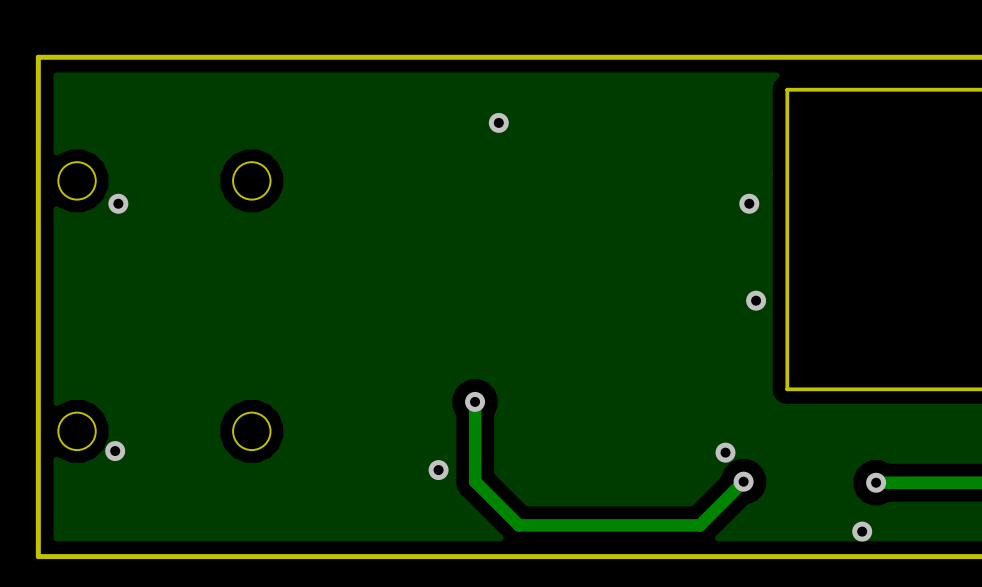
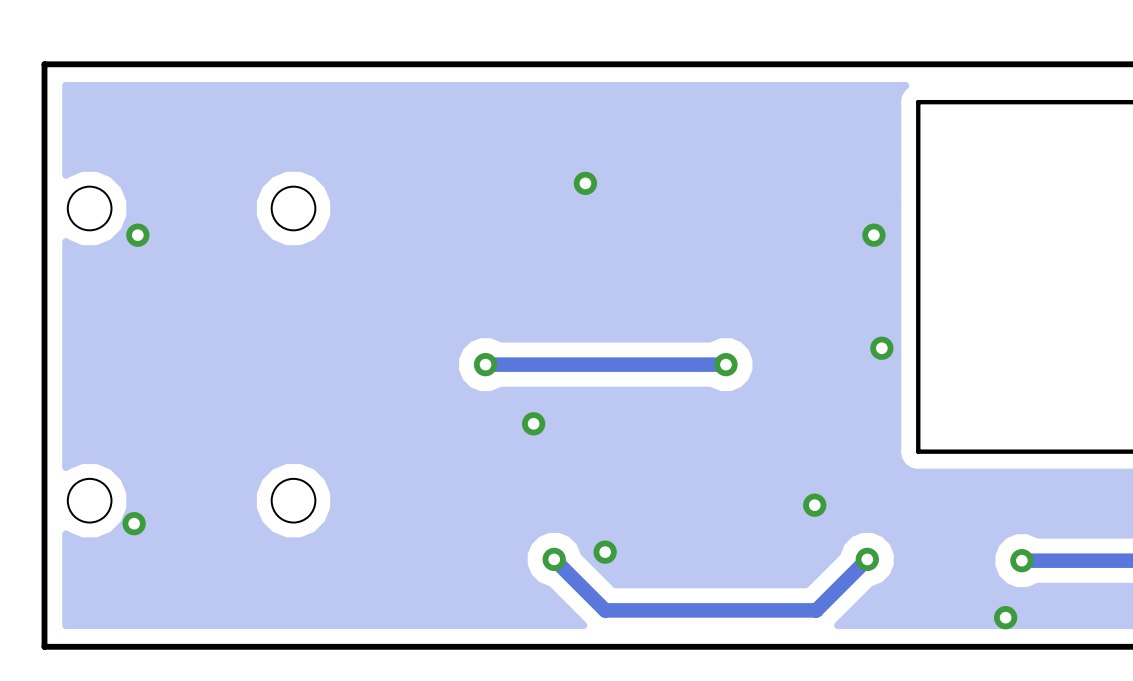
via position: (498, 122) -> (585, 183)
via: none -> (485, 364)
track: none -> (725, 364) (485, 364)
via: none -> (725, 364)
via: none -> (533, 423)
via: (475, 401) -> none
track: (475, 402) (475, 481) -> none
via position: (725, 452) -> (814, 505)
via position: (438, 470) -> (554, 559)
via: none -> (605, 552)

